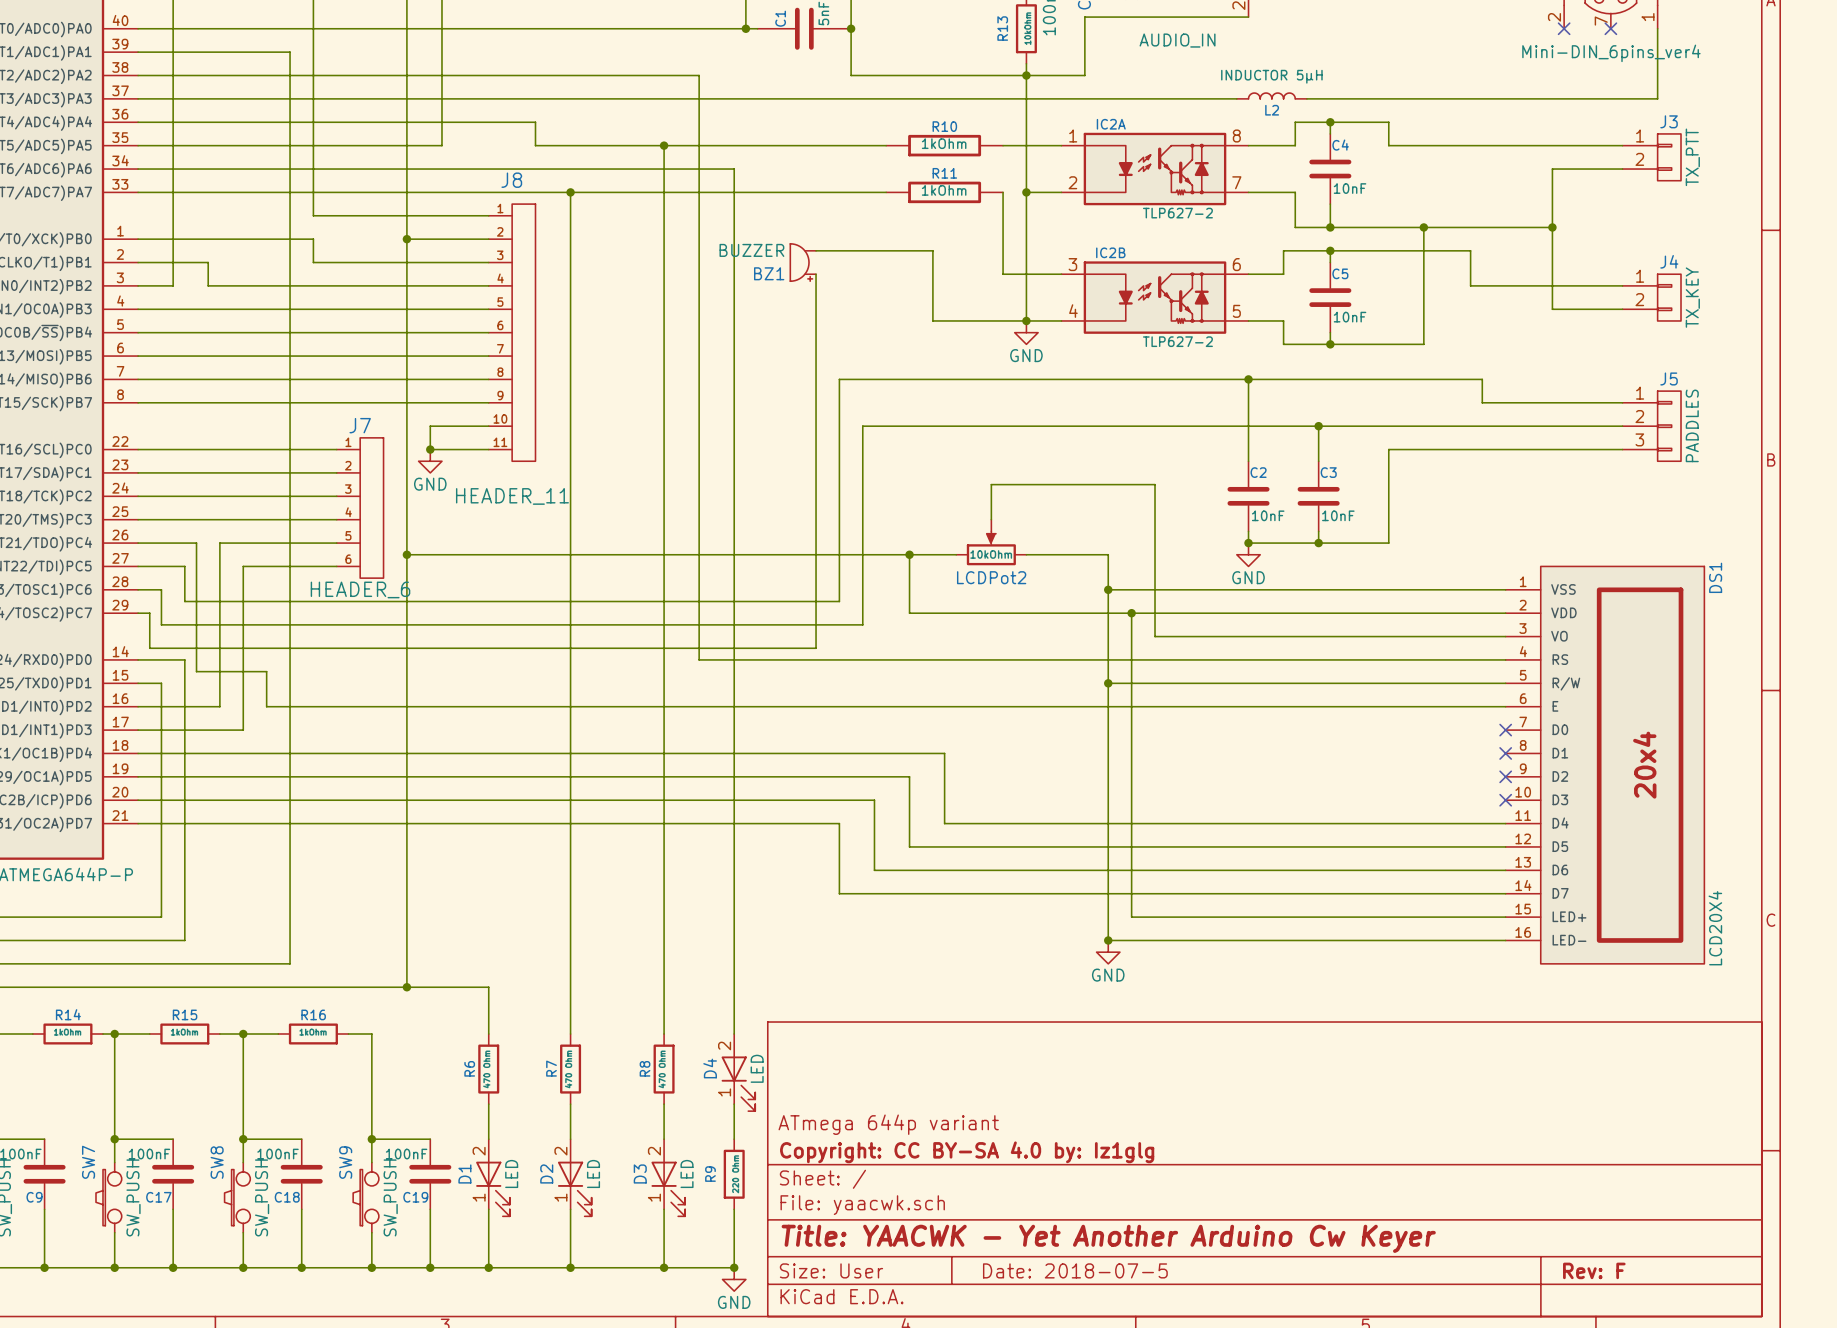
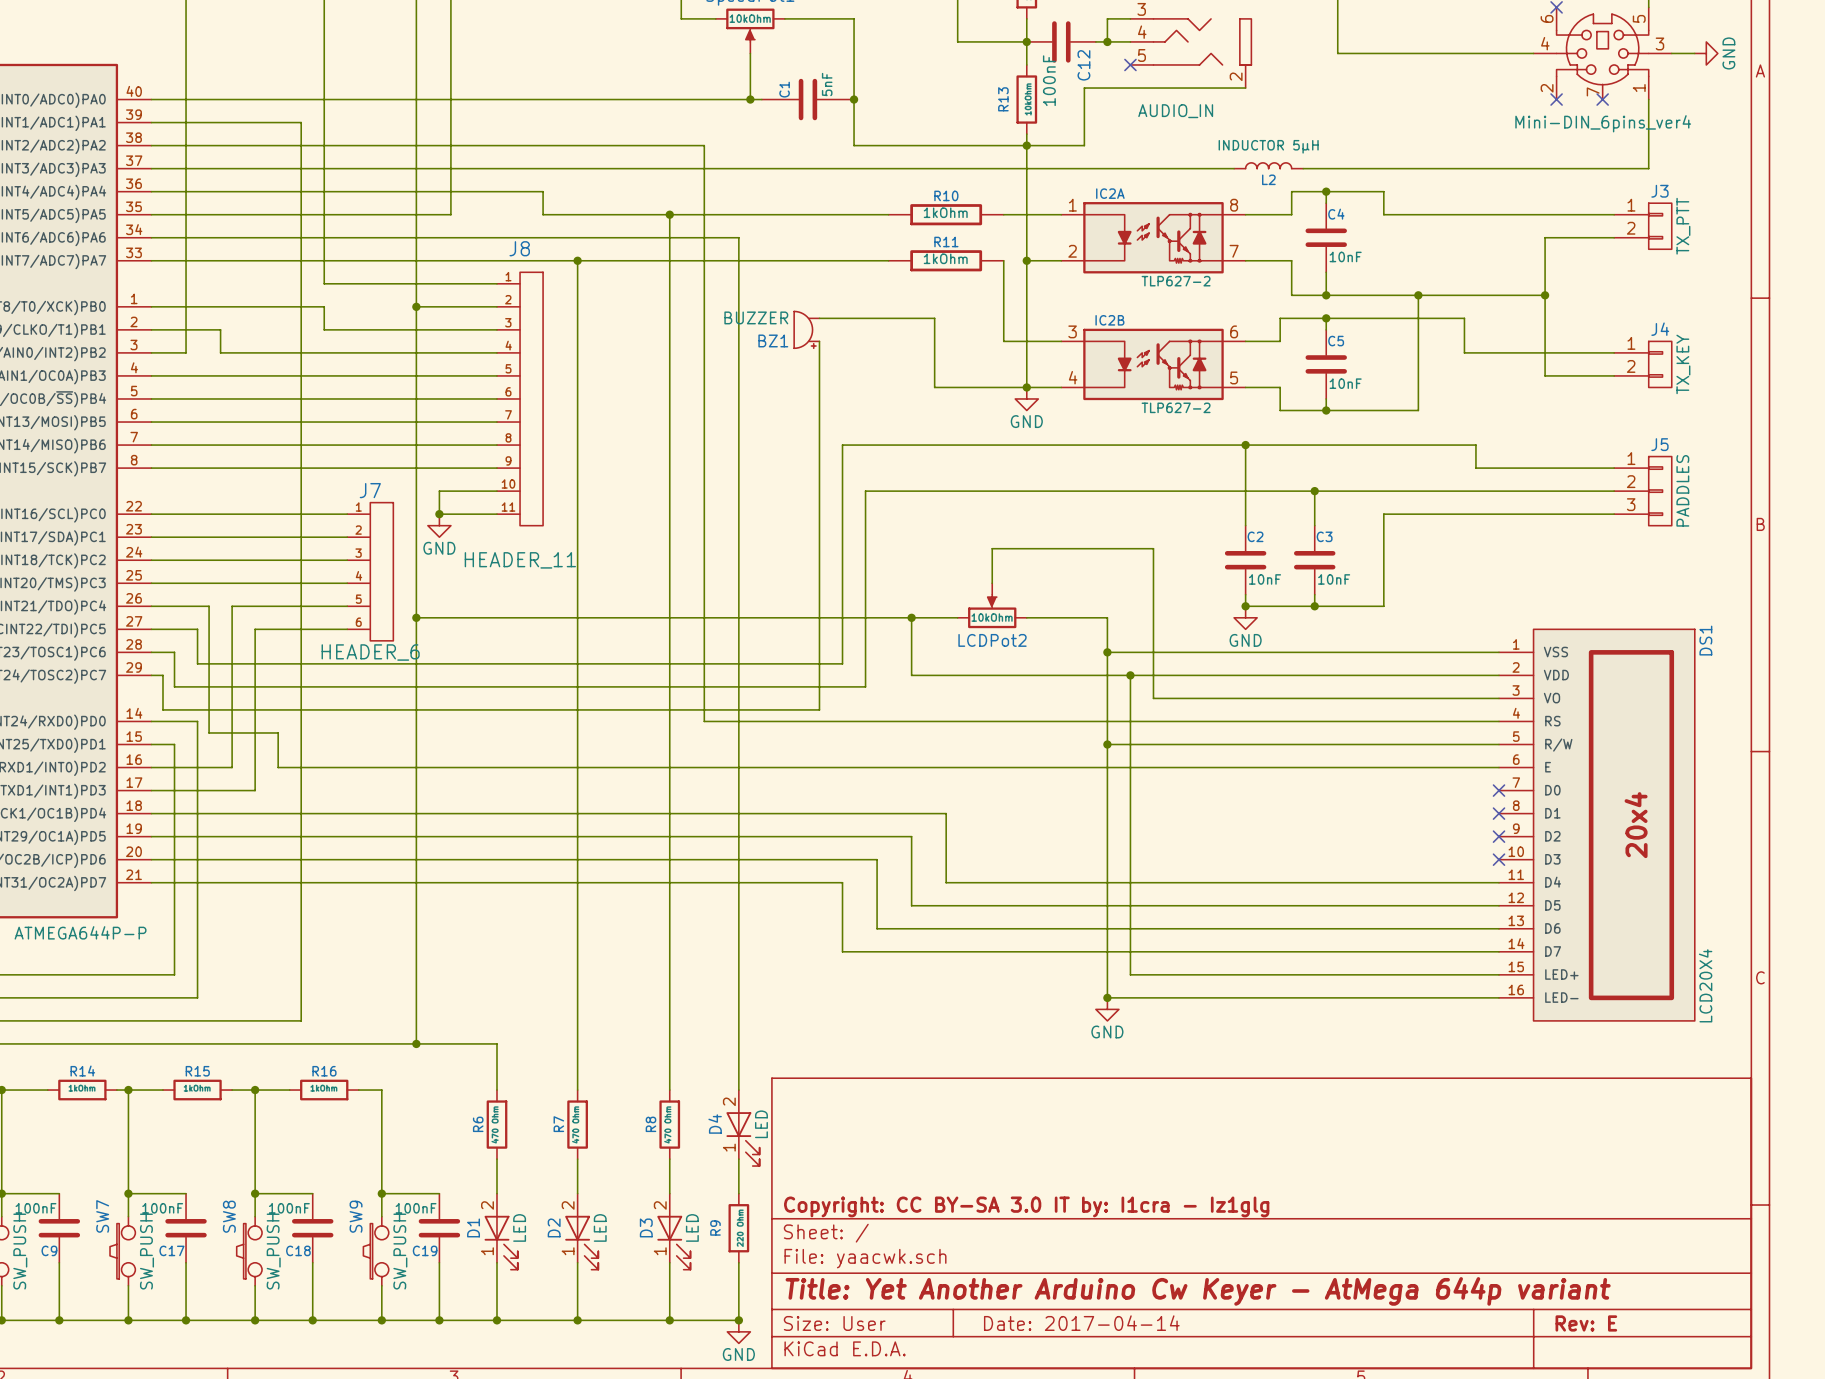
title block: ATmega 644p variant (888, 1124) -> none
title block: Copyright: CC BY-SA 4.0 by: Iz1glg (967, 1152) -> Copyright: CC BY-SA 3.0 IT by: I1cra - Iz1glg (1026, 1206)
title block: Title: YAACWK - Yet Another Arduino Cw Keyer (1108, 1238) -> Title: Yet Another Arduino Cw Keyer - AtMega 644p variant (1198, 1291)
title block: Date: 2018-07-5 (1075, 1270) -> Date: 2017-04-14 (1081, 1323)
title block: Rev: F (1594, 1270) -> Rev: E (1586, 1323)

